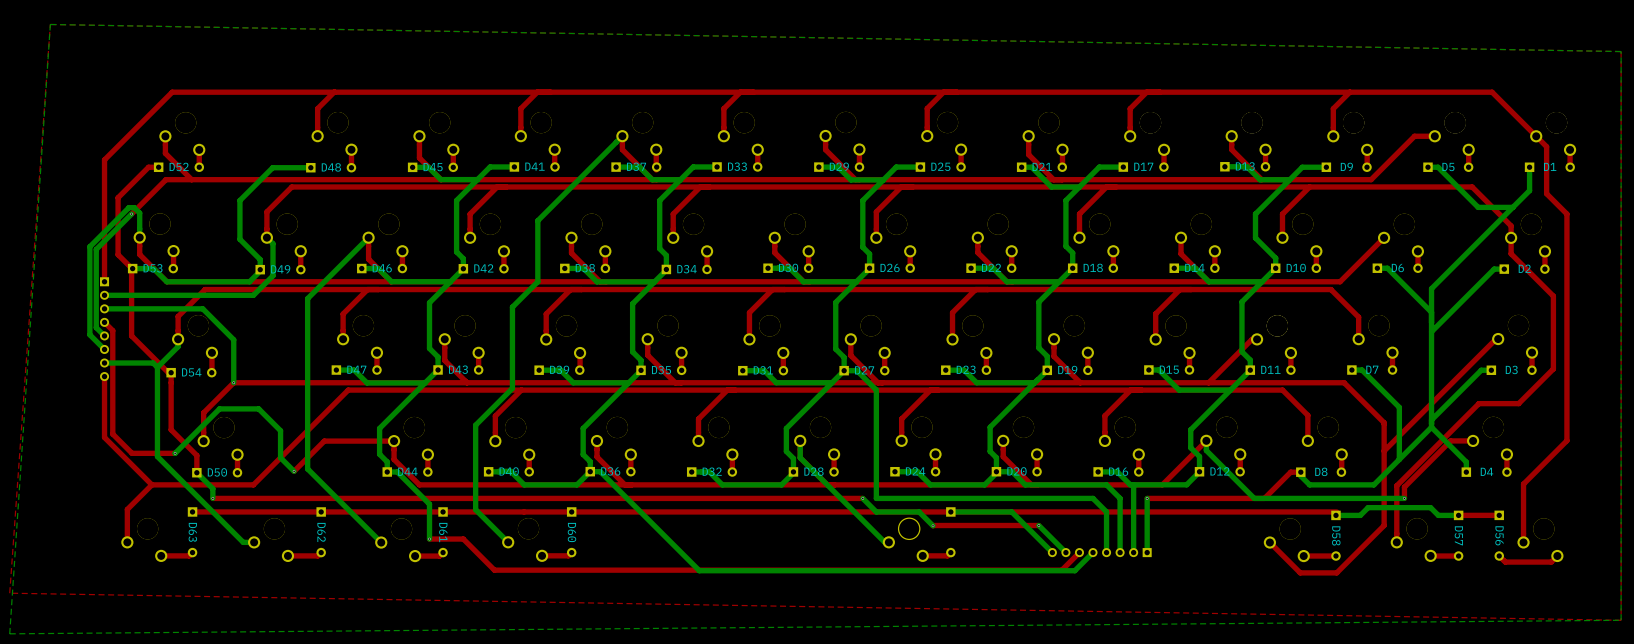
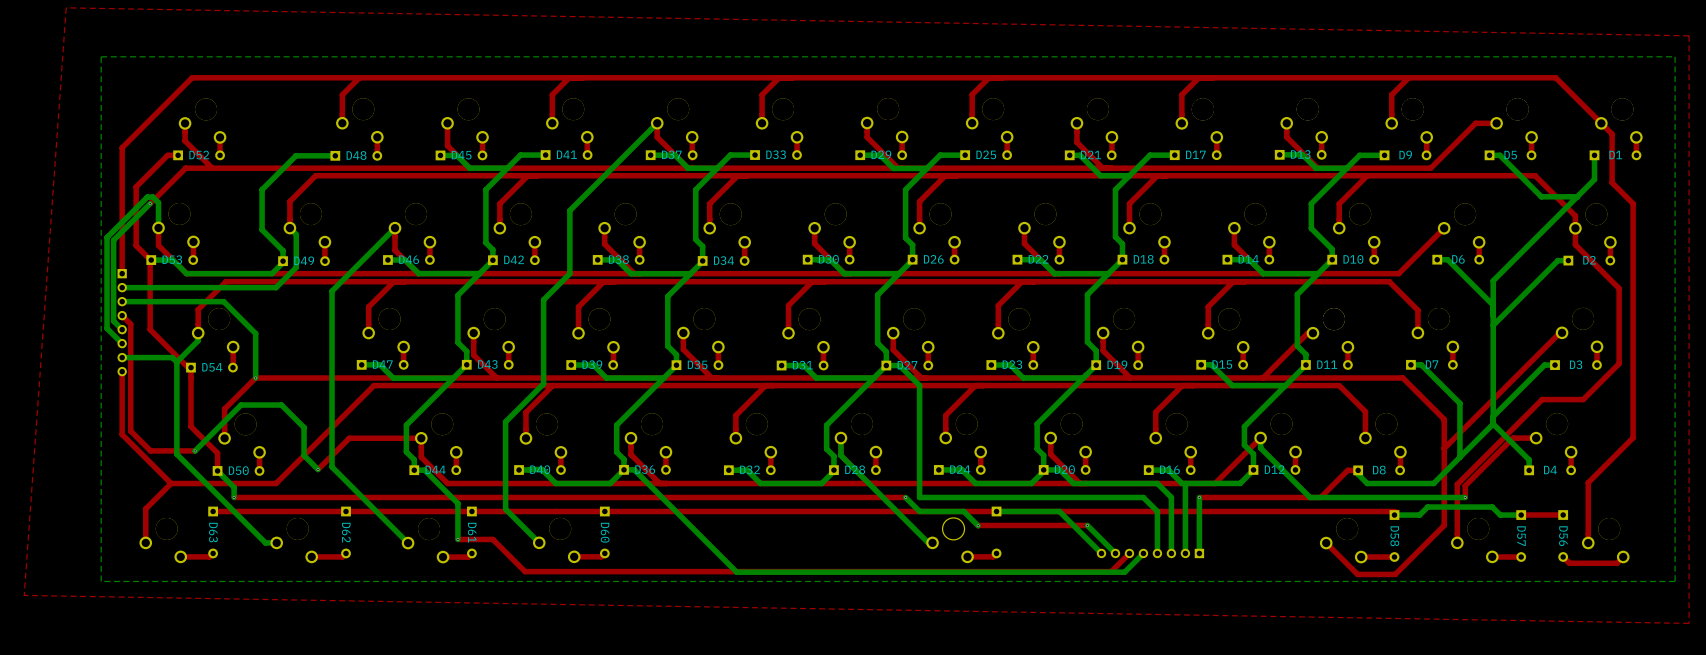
bottom zone outline: (50, 24) (1621, 51) (1621, 620) (9, 633) (50, 24) -> (1675, 56) (1675, 581) (101, 581) (101, 56) (1675, 56)

